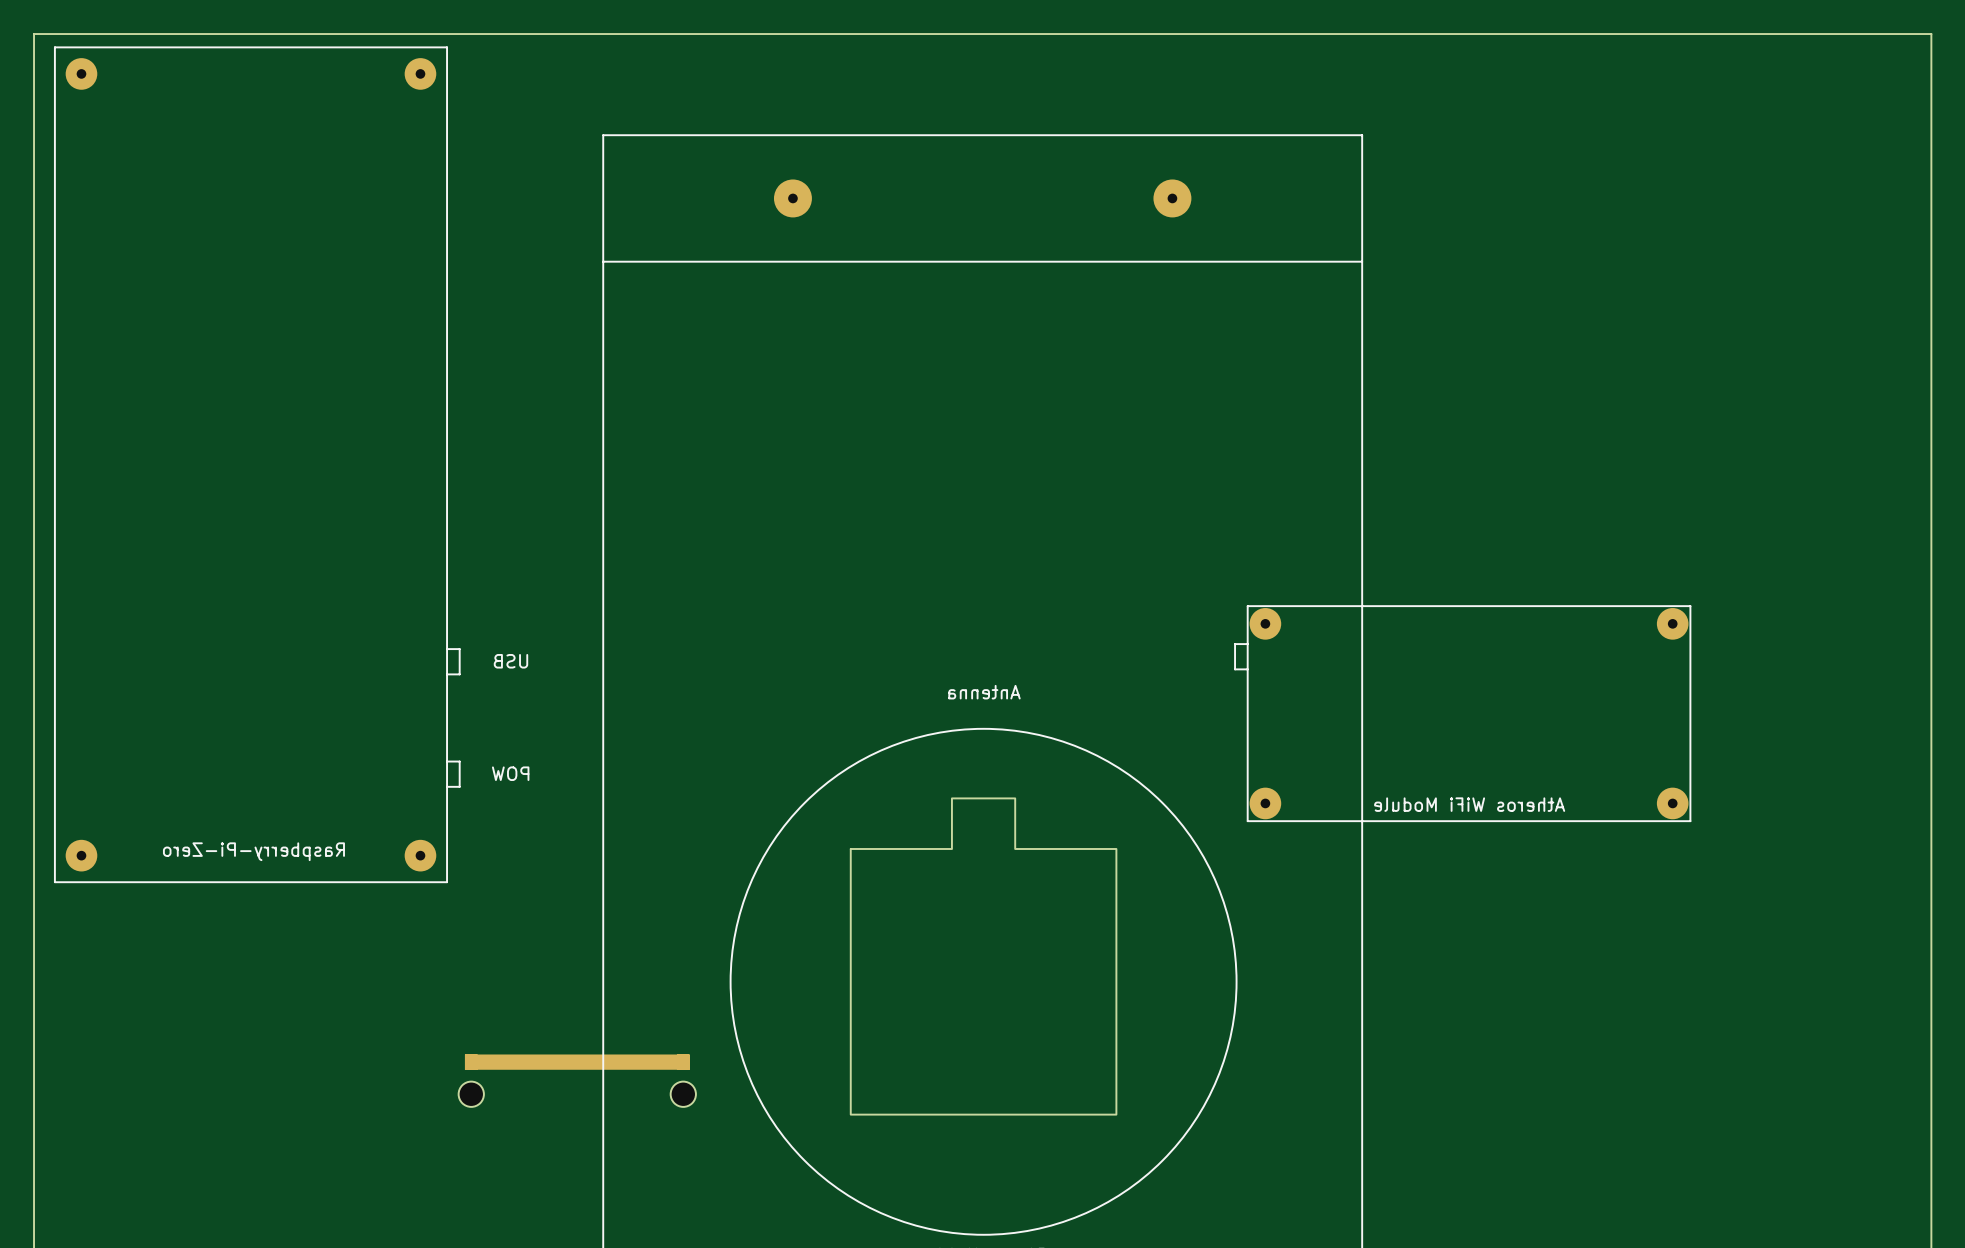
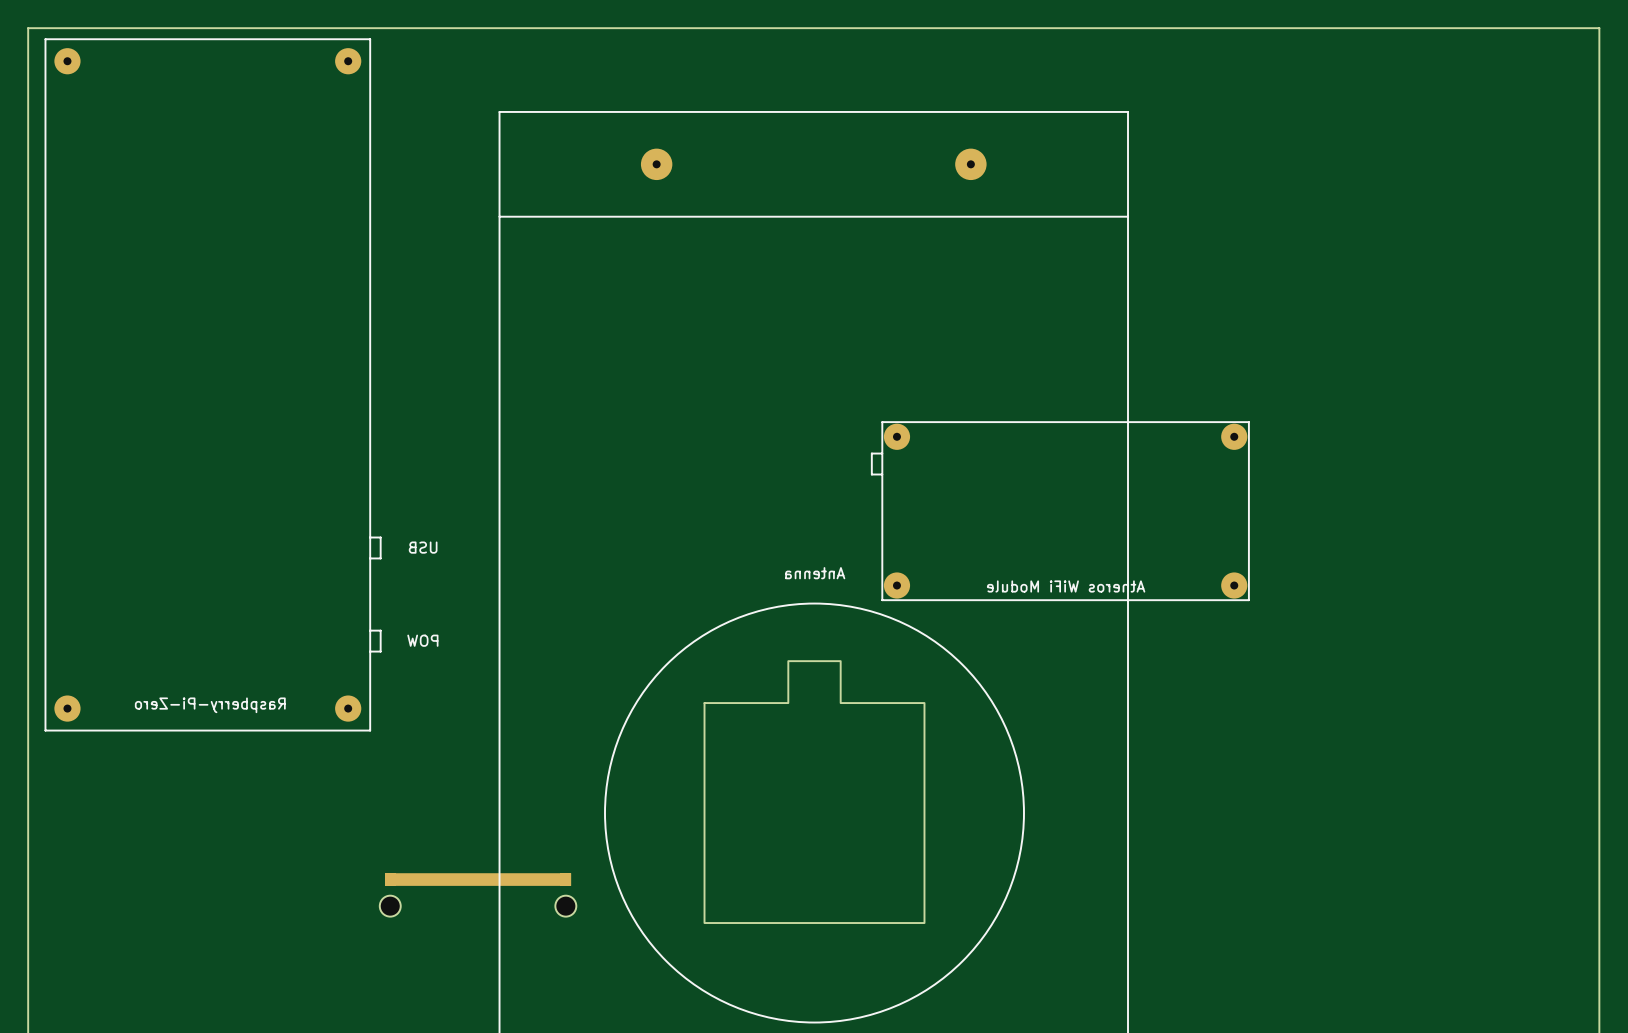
part position: (1462, 713) -> (1060, 511)

